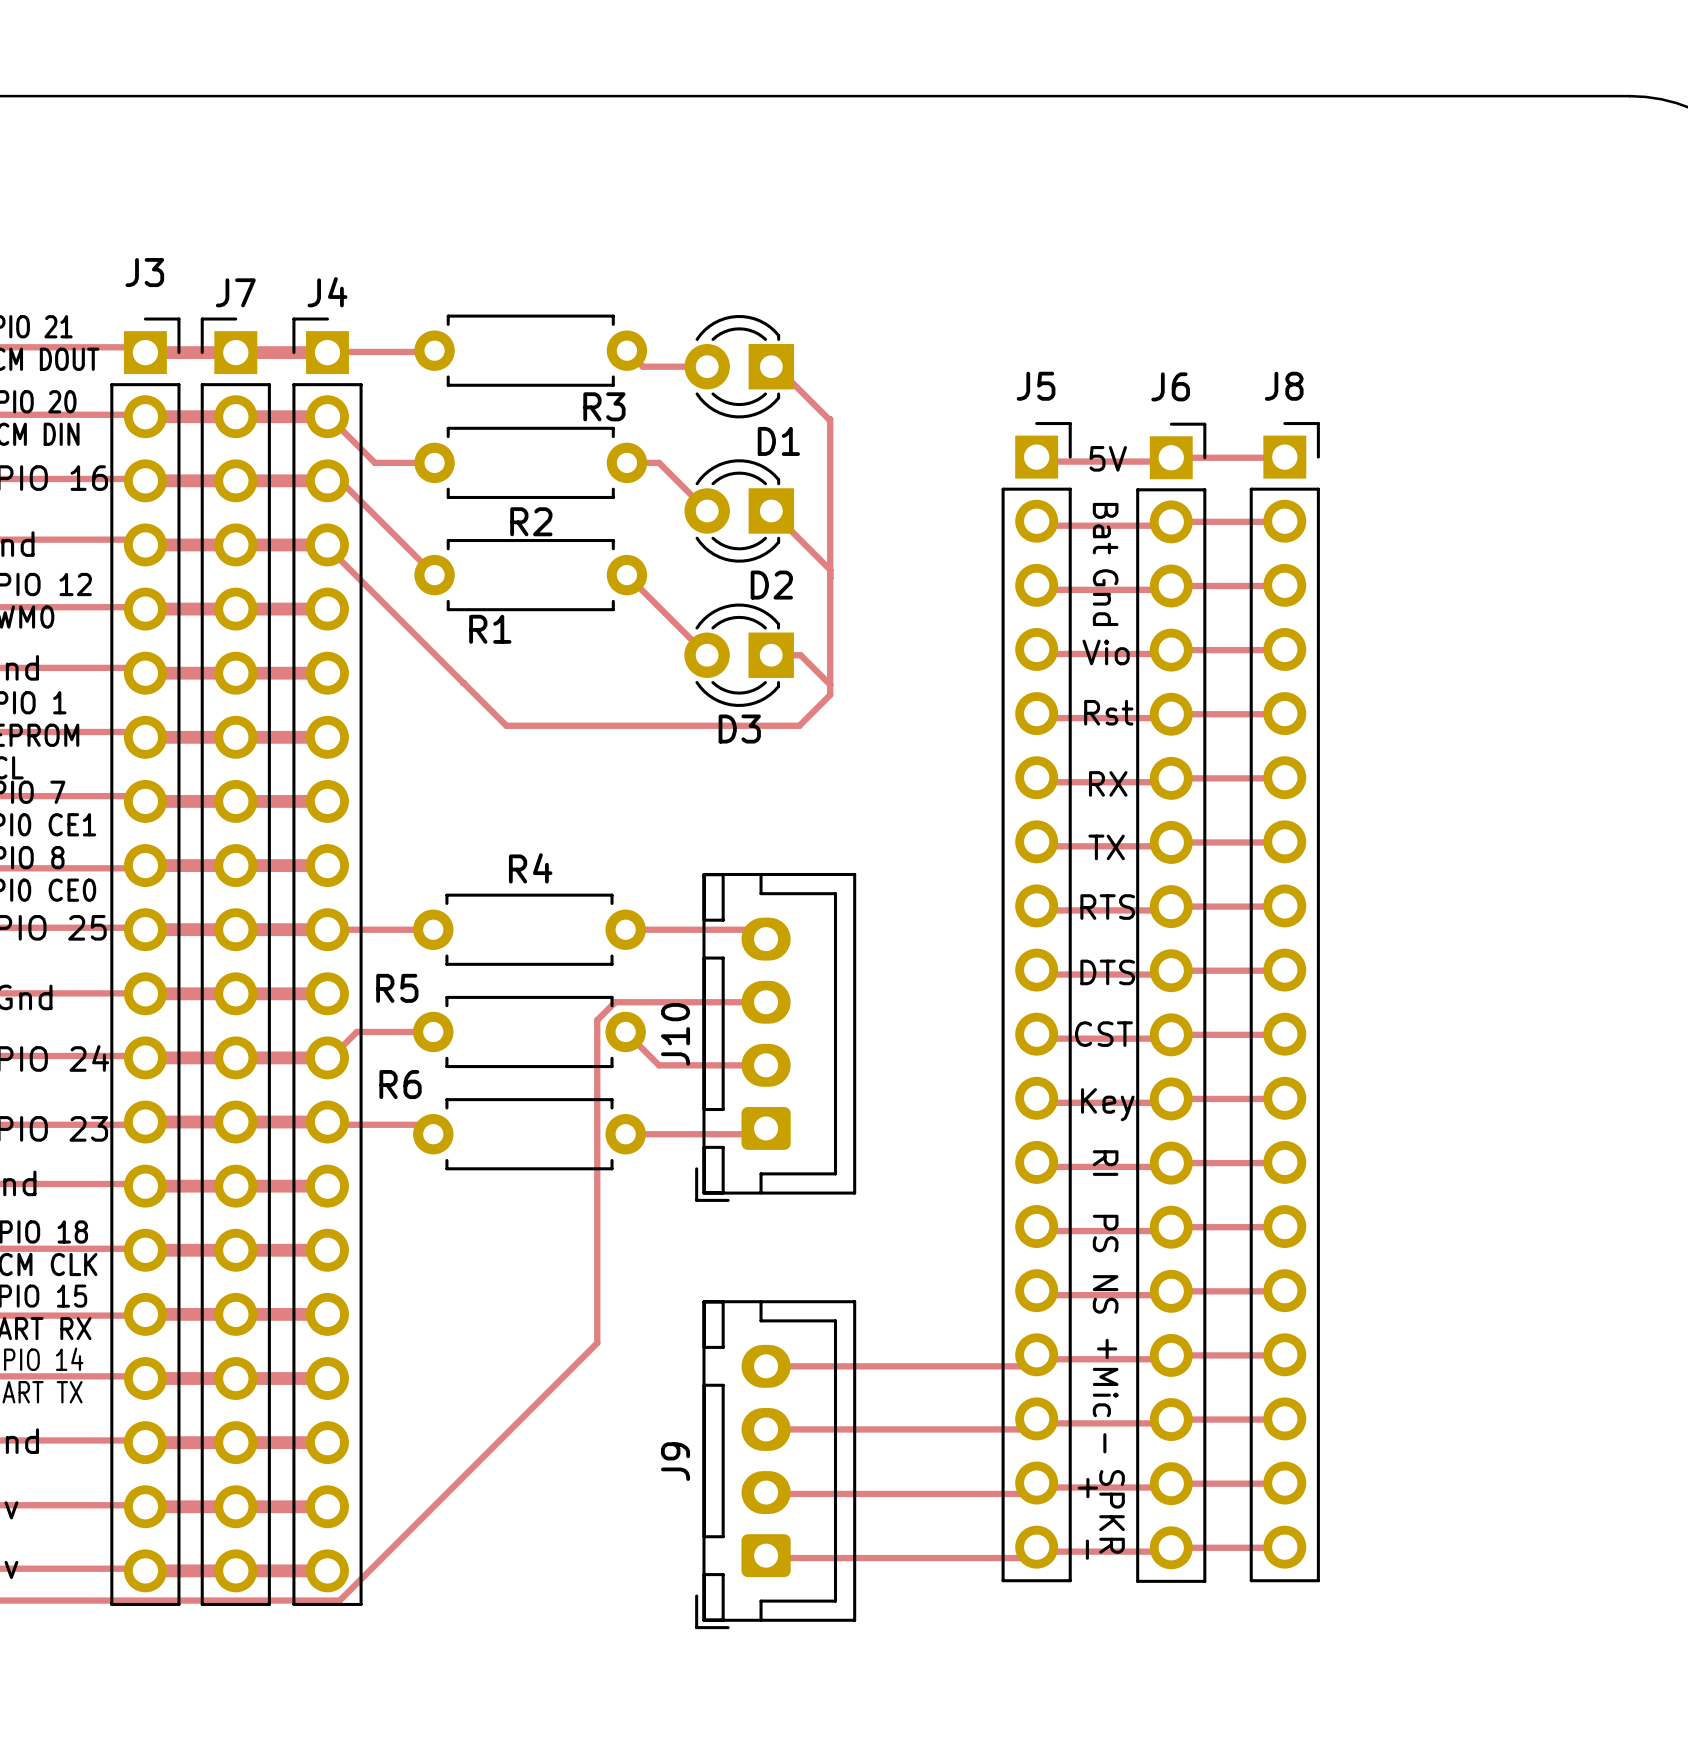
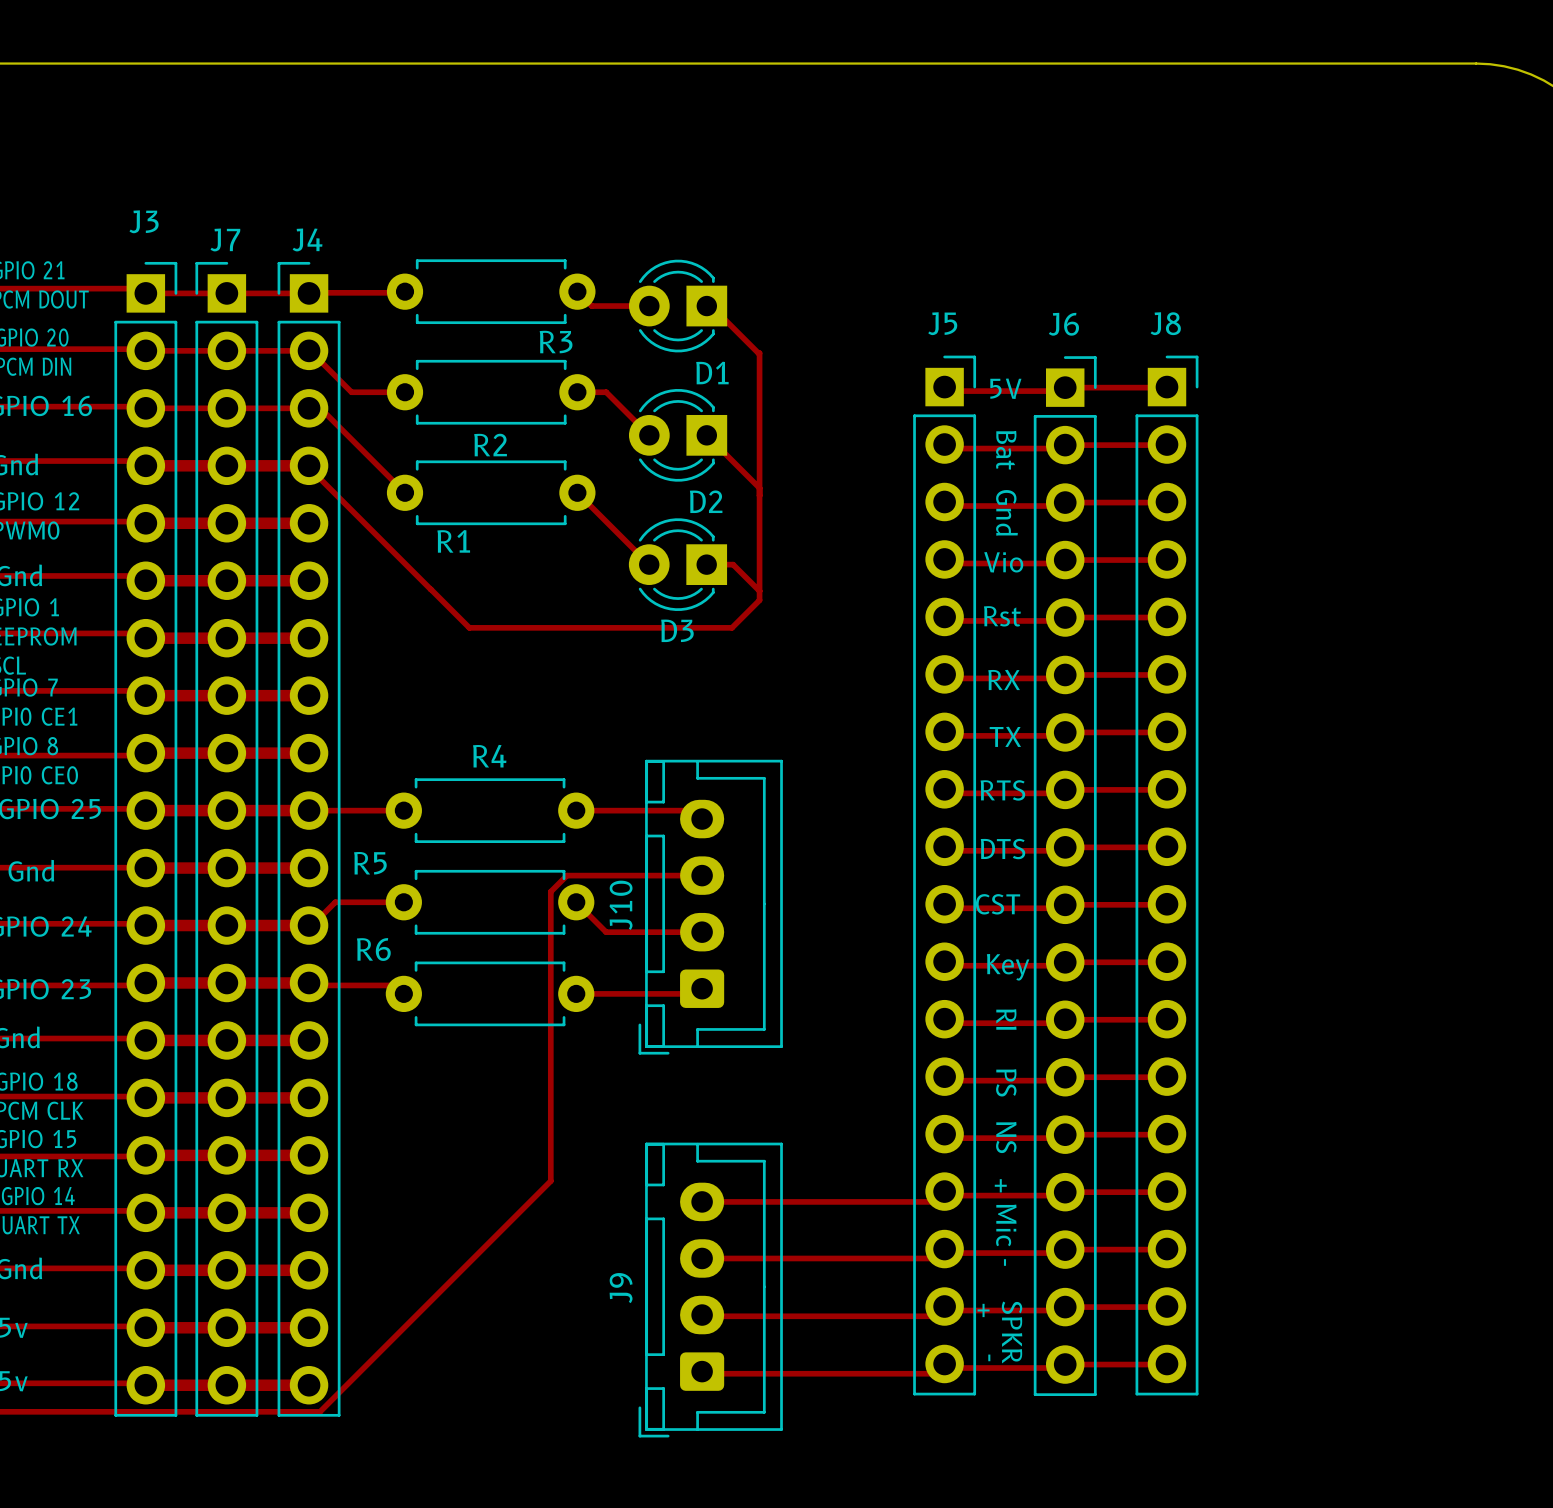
track width: thick (145, 352) (327, 352) -> thin (145, 293) (309, 293)
track width: thick (145, 416) (327, 416) -> thin (145, 350) (309, 350)
track width: thick (145, 480) (327, 480) -> thin (145, 408) (309, 408)

